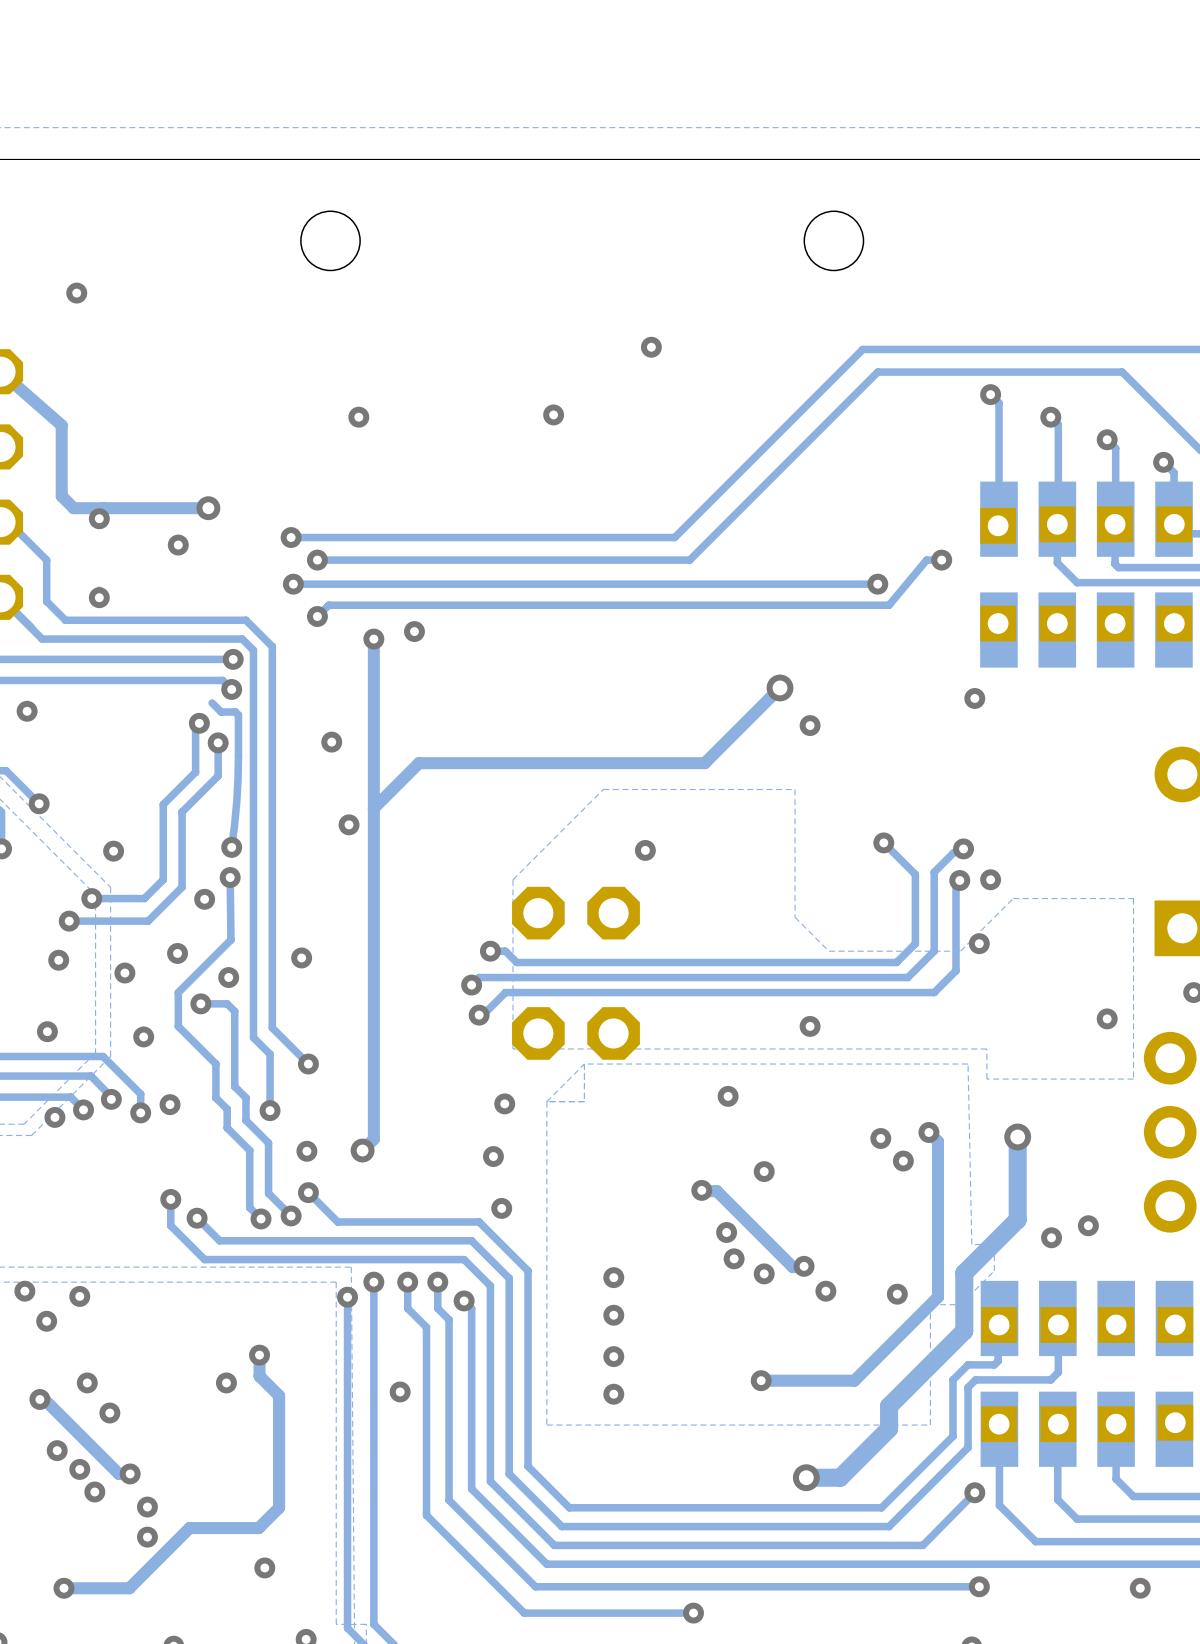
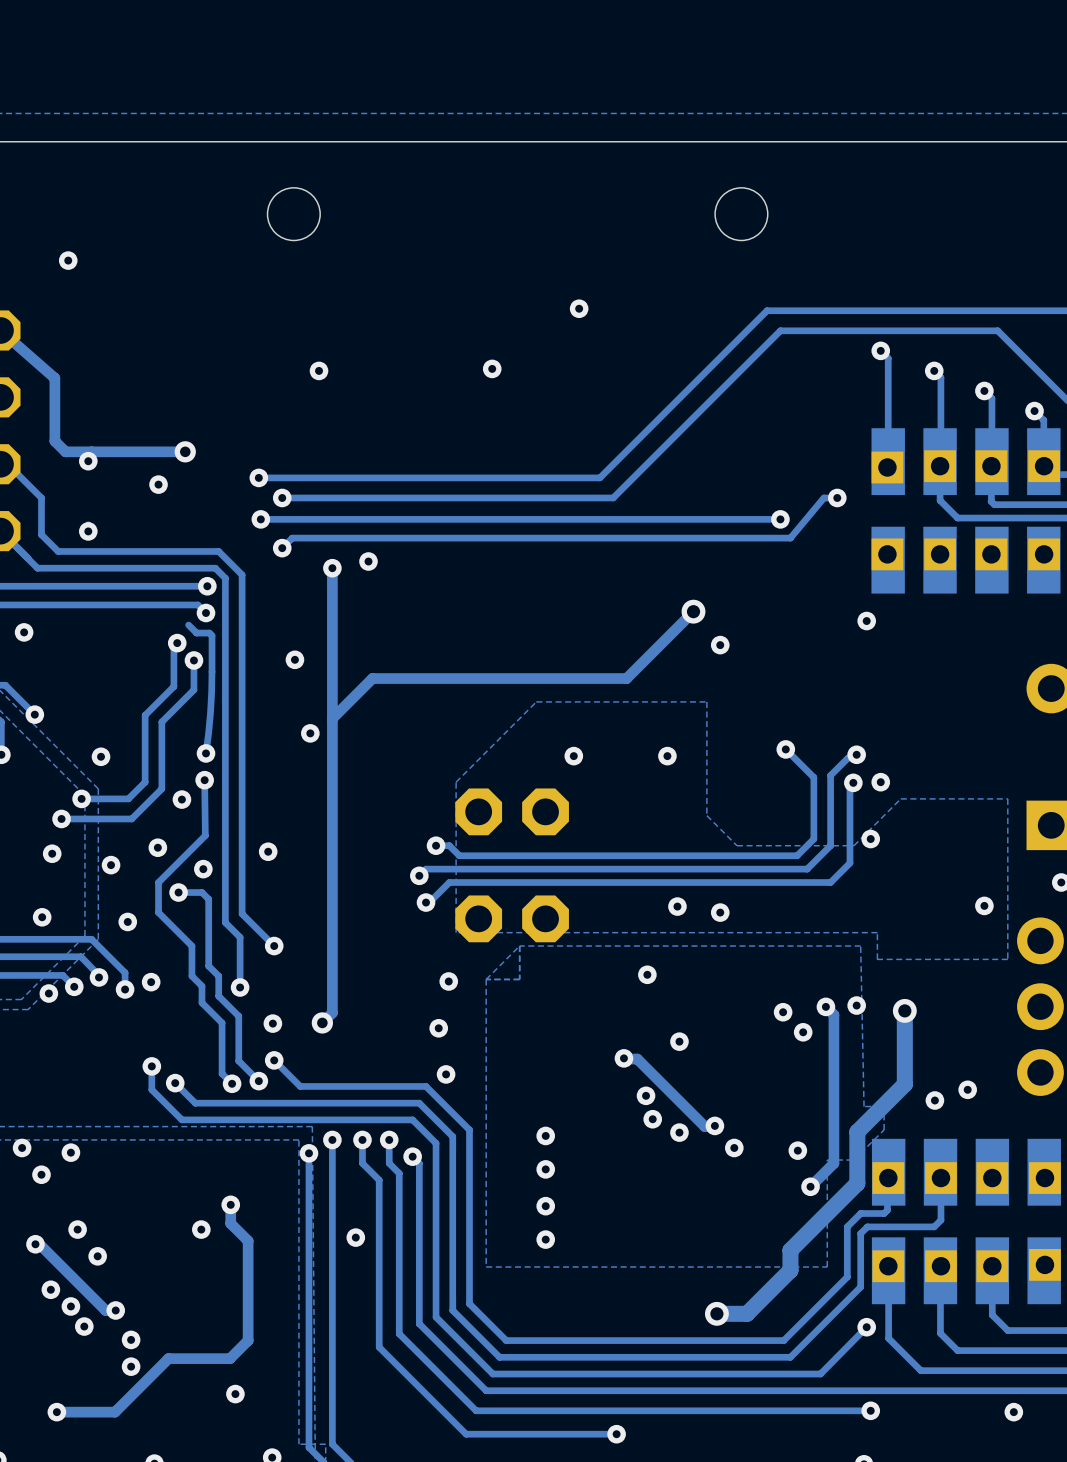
via: none -> (667, 756)
via: none -> (677, 906)
via: none -> (856, 1005)
track: (937, 1297) (854, 1380) (761, 1380) -> (833, 1153) (833, 1163) (810, 1186)
via position: (761, 1380) -> (810, 1186)

